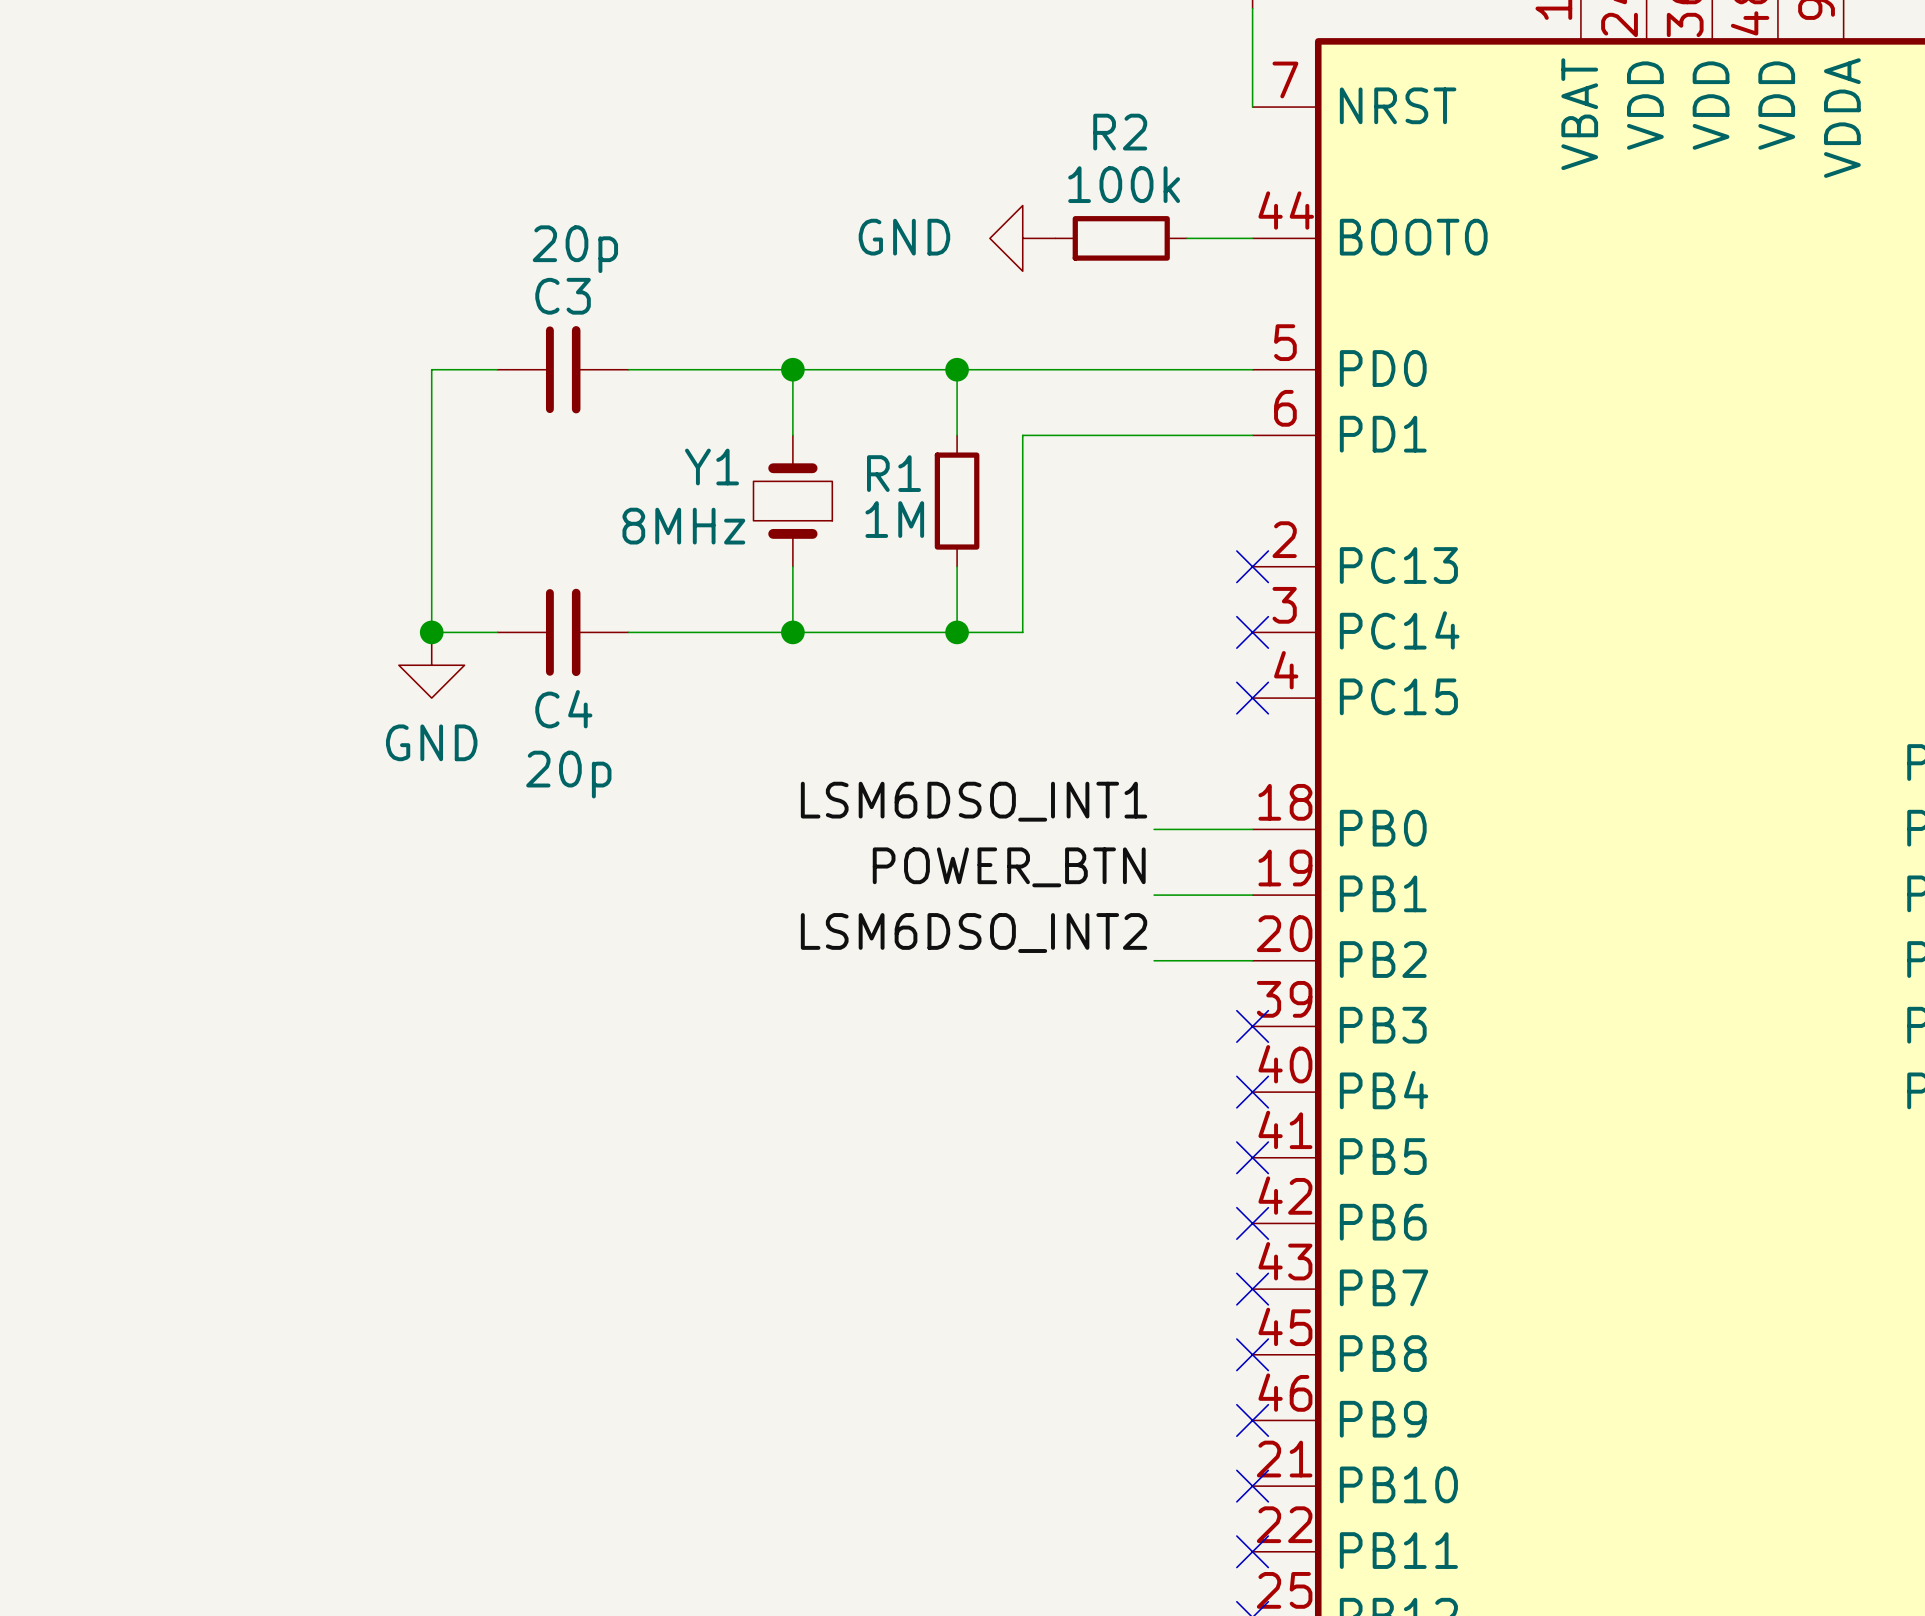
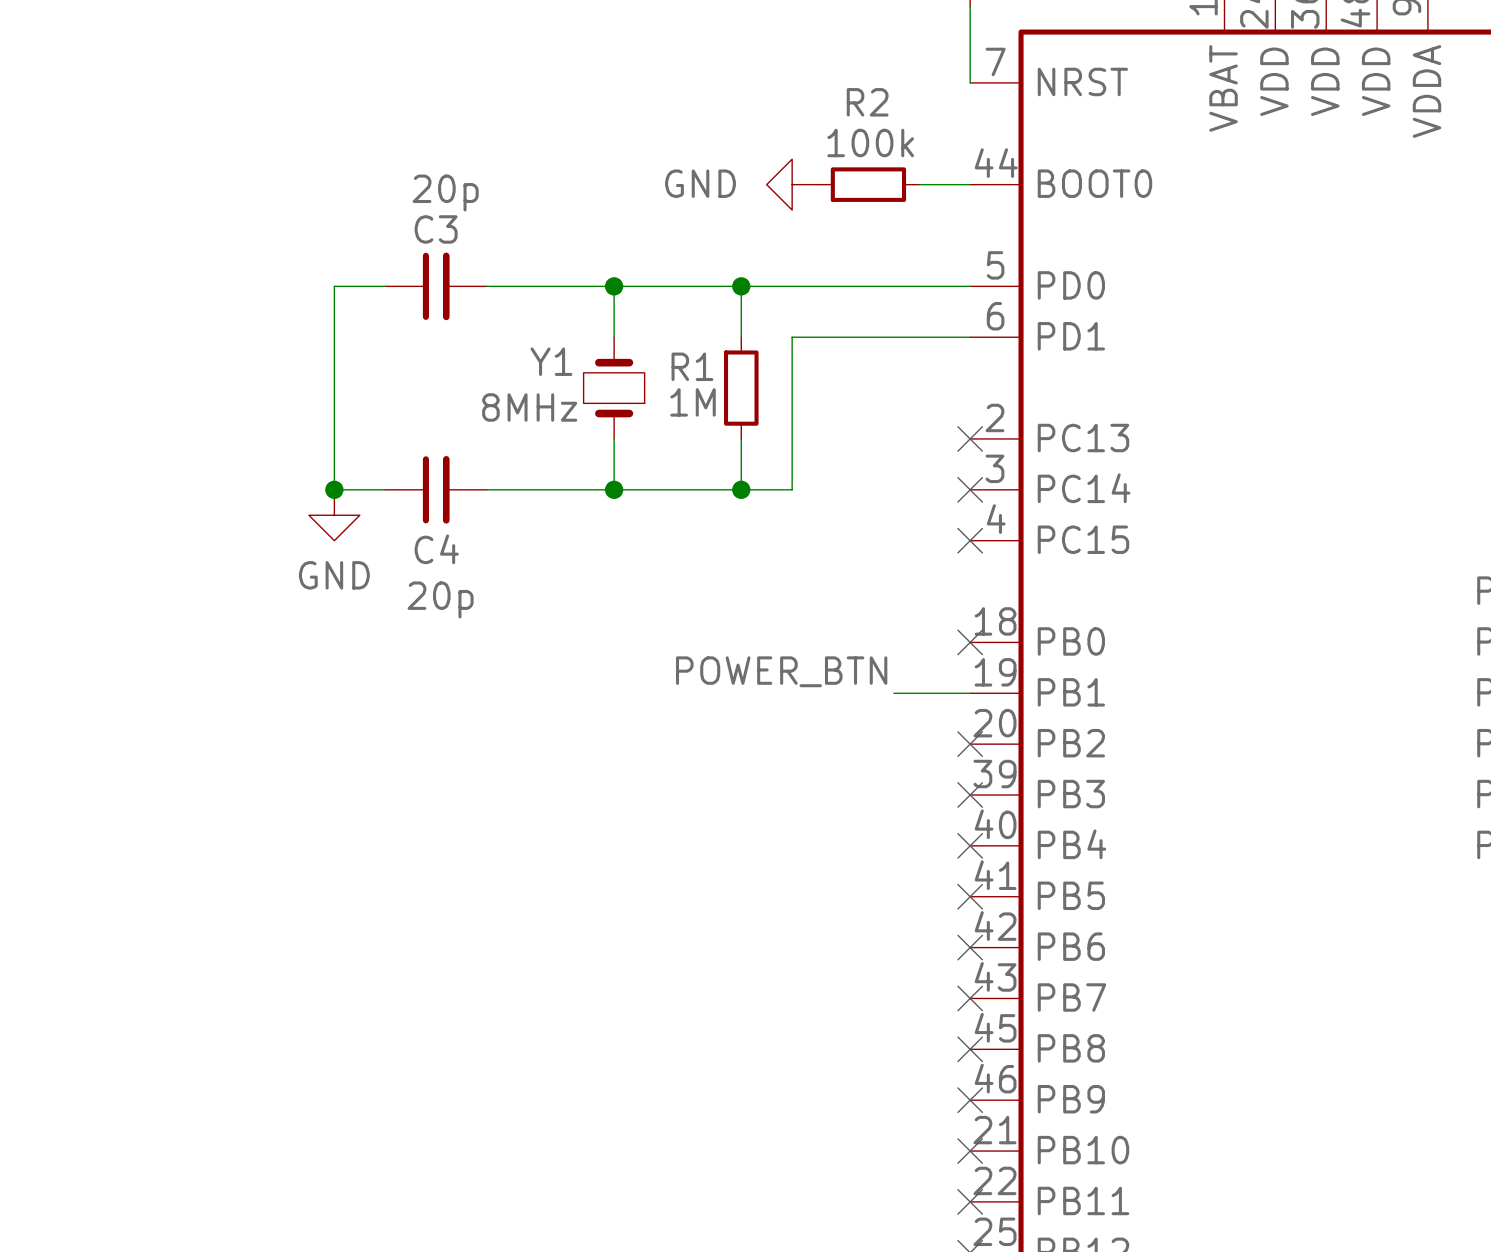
label: LSM6DSO_INT1 (974, 801) -> none
wire: (1154, 829) (1252, 829) -> none
no-connect mark: none -> (970, 642)
label: LSM6DSO_INT2 (974, 933) -> none
wire: (1154, 960) (1252, 960) -> none
no-connect mark: none -> (970, 744)

